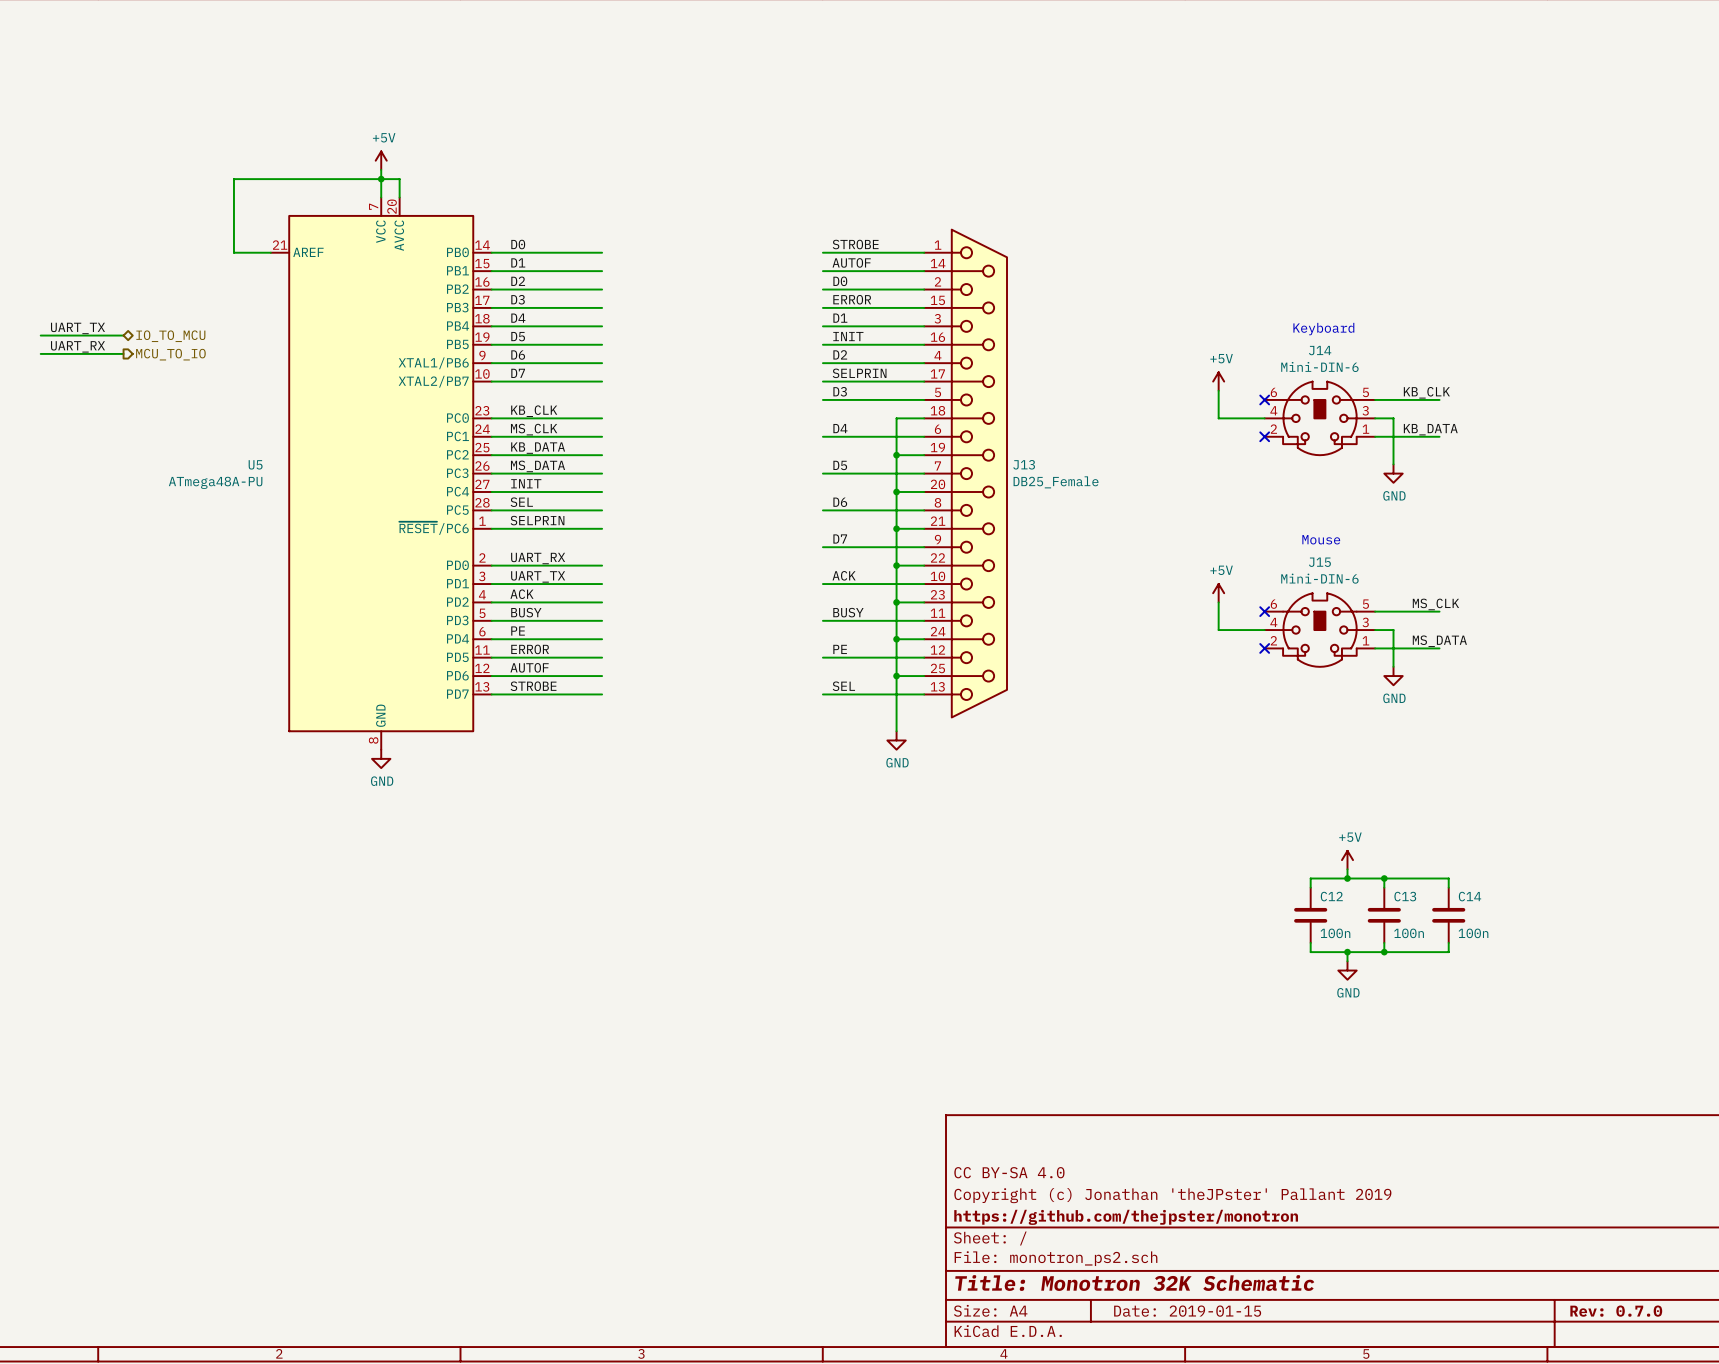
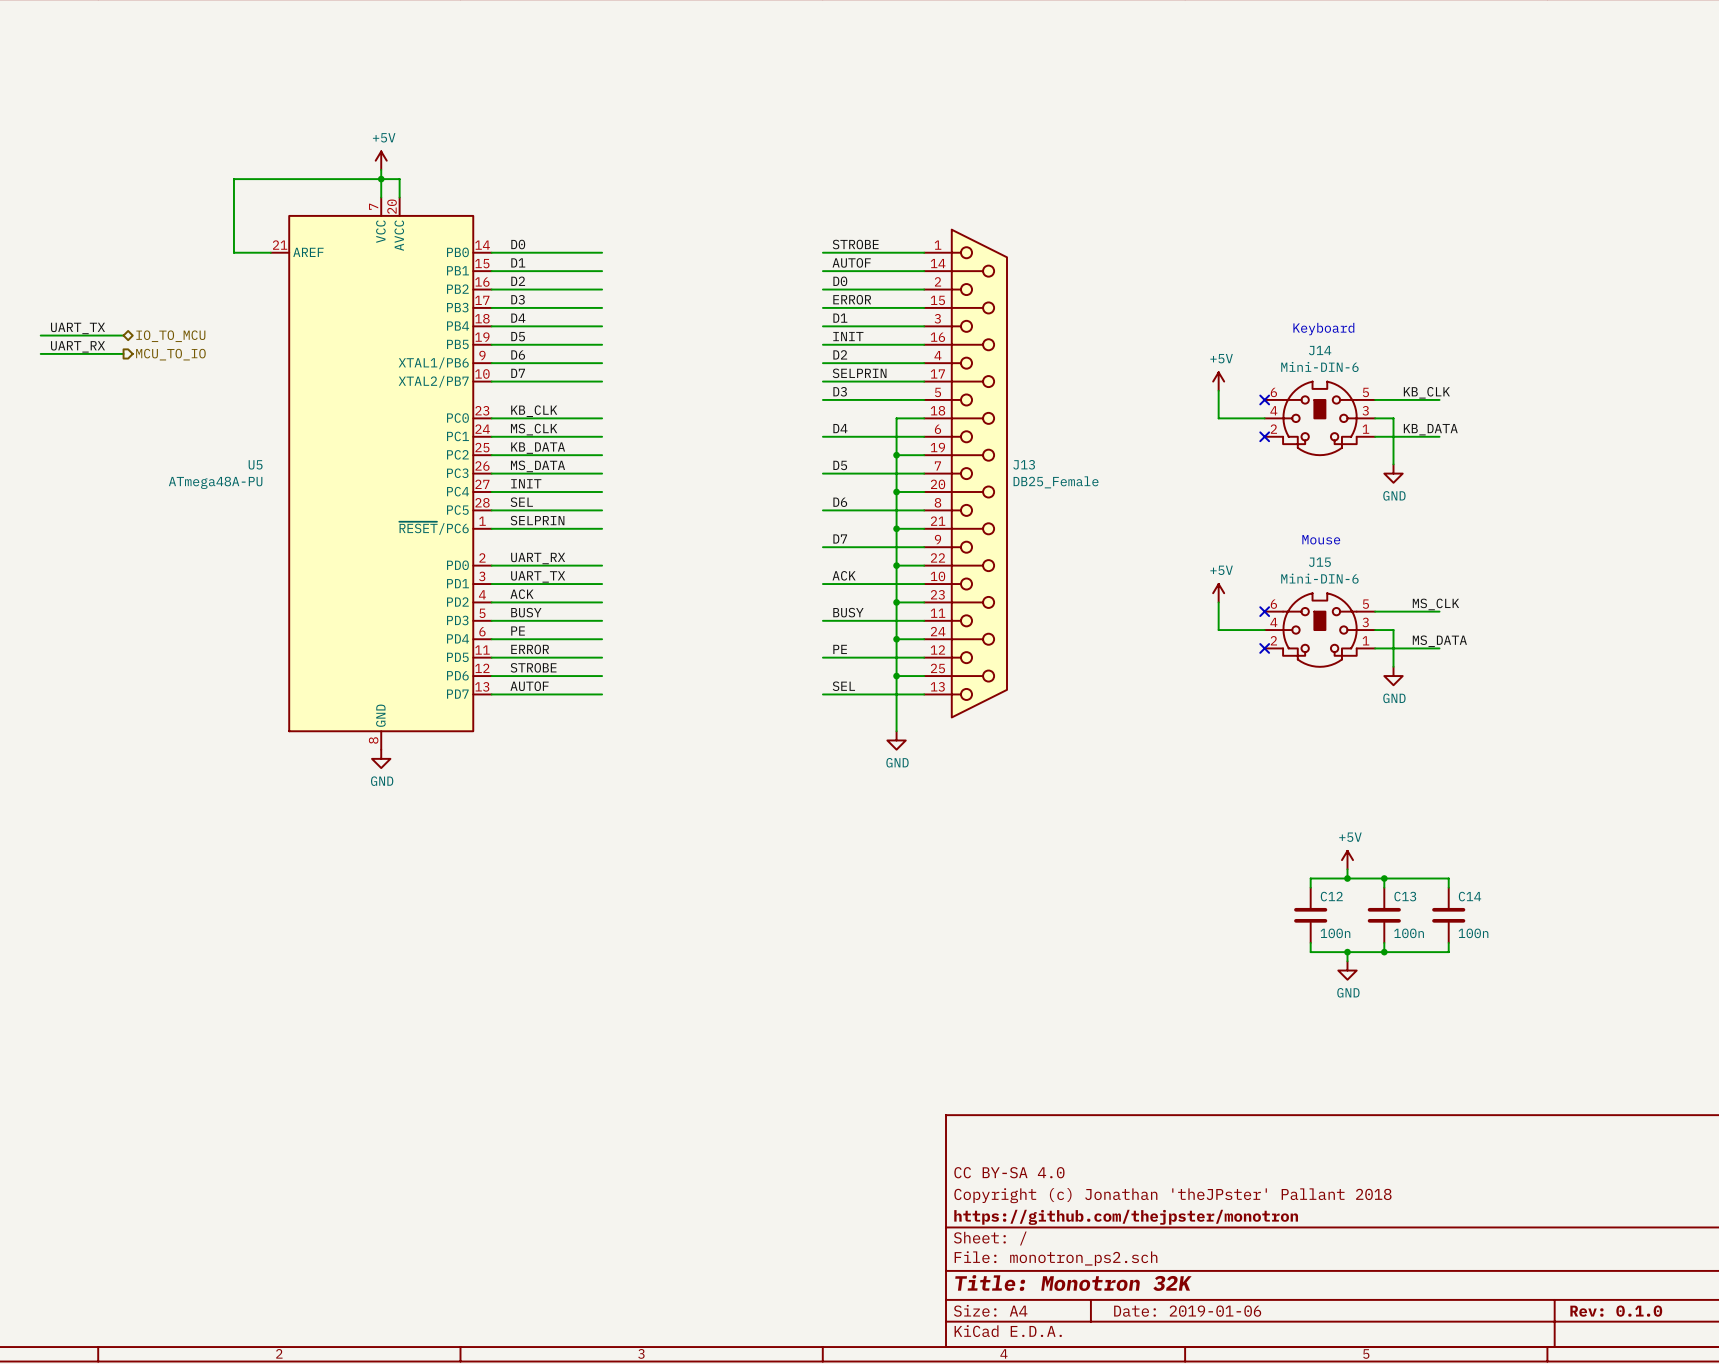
label: AUTOF (529, 667) -> STROBE (533, 667)
label: STROBE (533, 686) -> AUTOF (529, 686)
title block: Copyright (c) Jonathan 'theJPster' Pallant 2019 (1172, 1195) -> Copyright (c) Jonathan 'theJPster' Pallant 2018 (1172, 1195)
title block: Title: Monotron 32K Schematic (1134, 1283) -> Title: Monotron 32K (1073, 1283)
title block: Date: 2019-01-15 (1187, 1311) -> Date: 2019-01-06 (1187, 1311)
title block: Rev: 0.7.0 (1616, 1311) -> Rev: 0.1.0 (1616, 1311)

